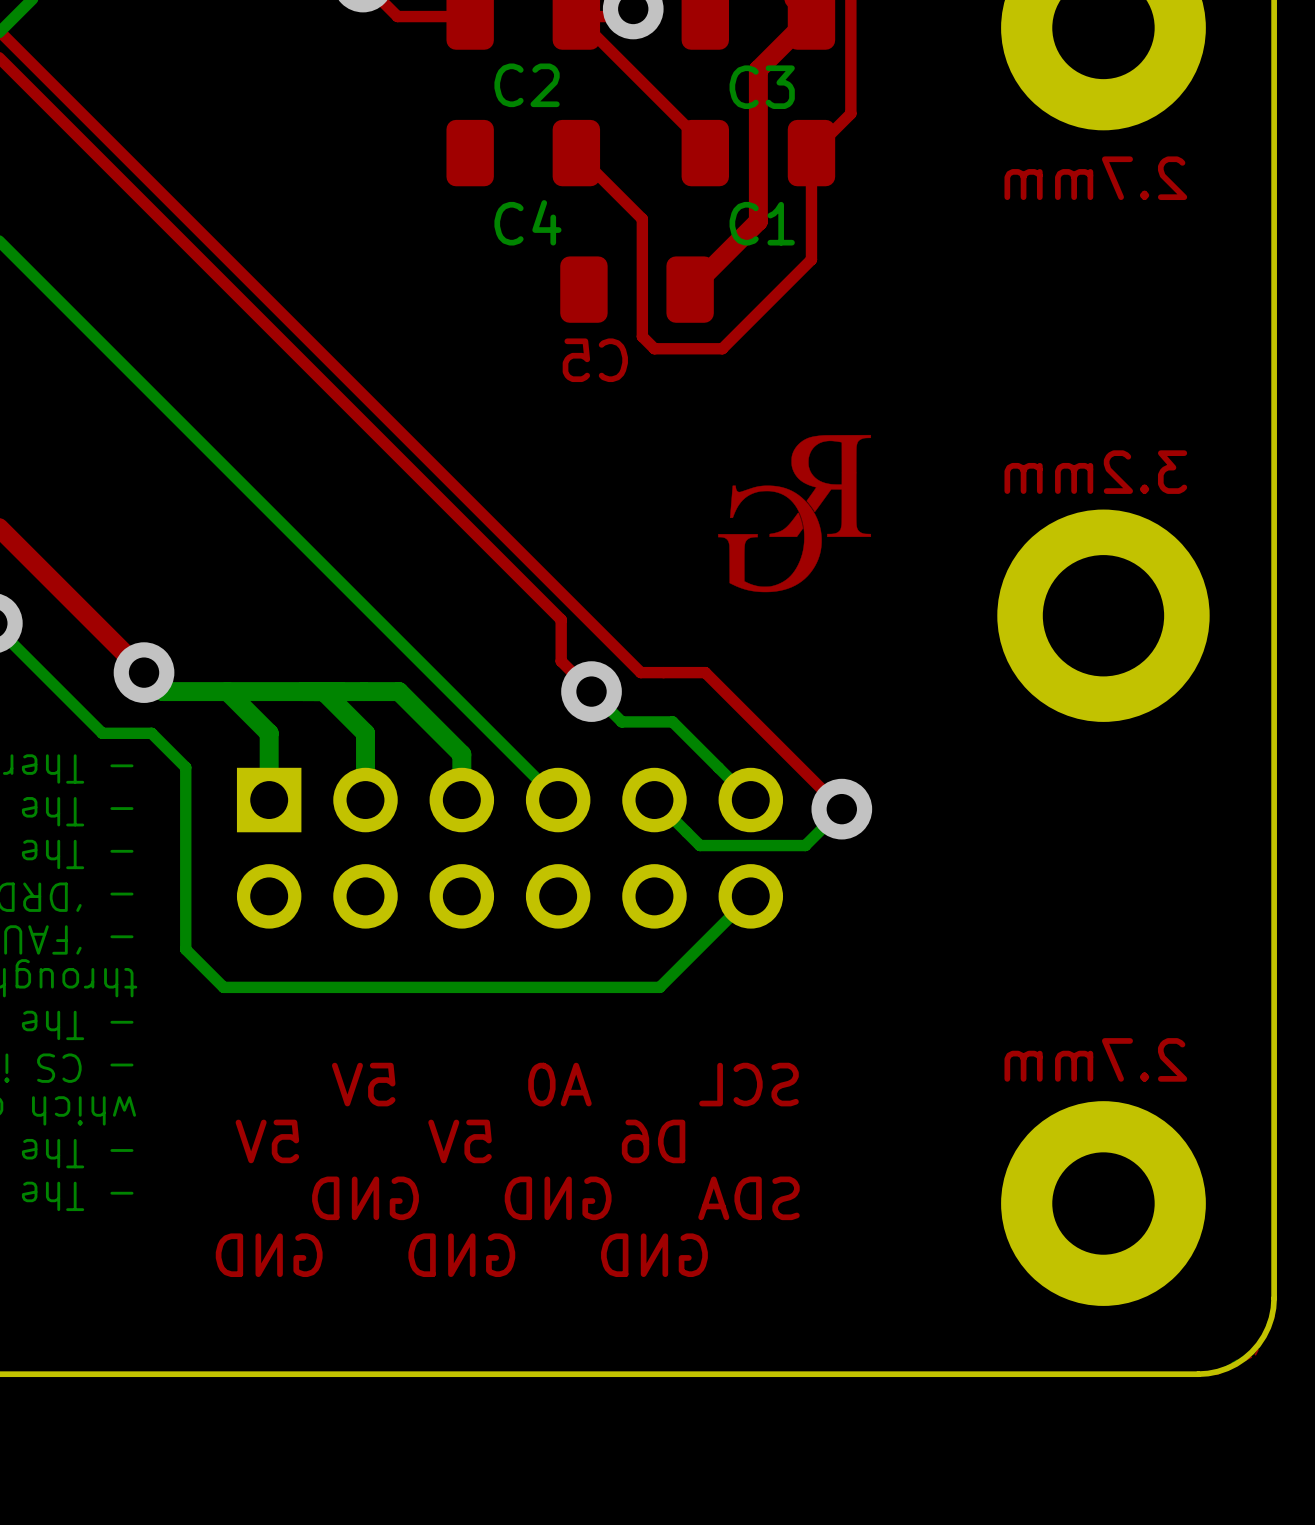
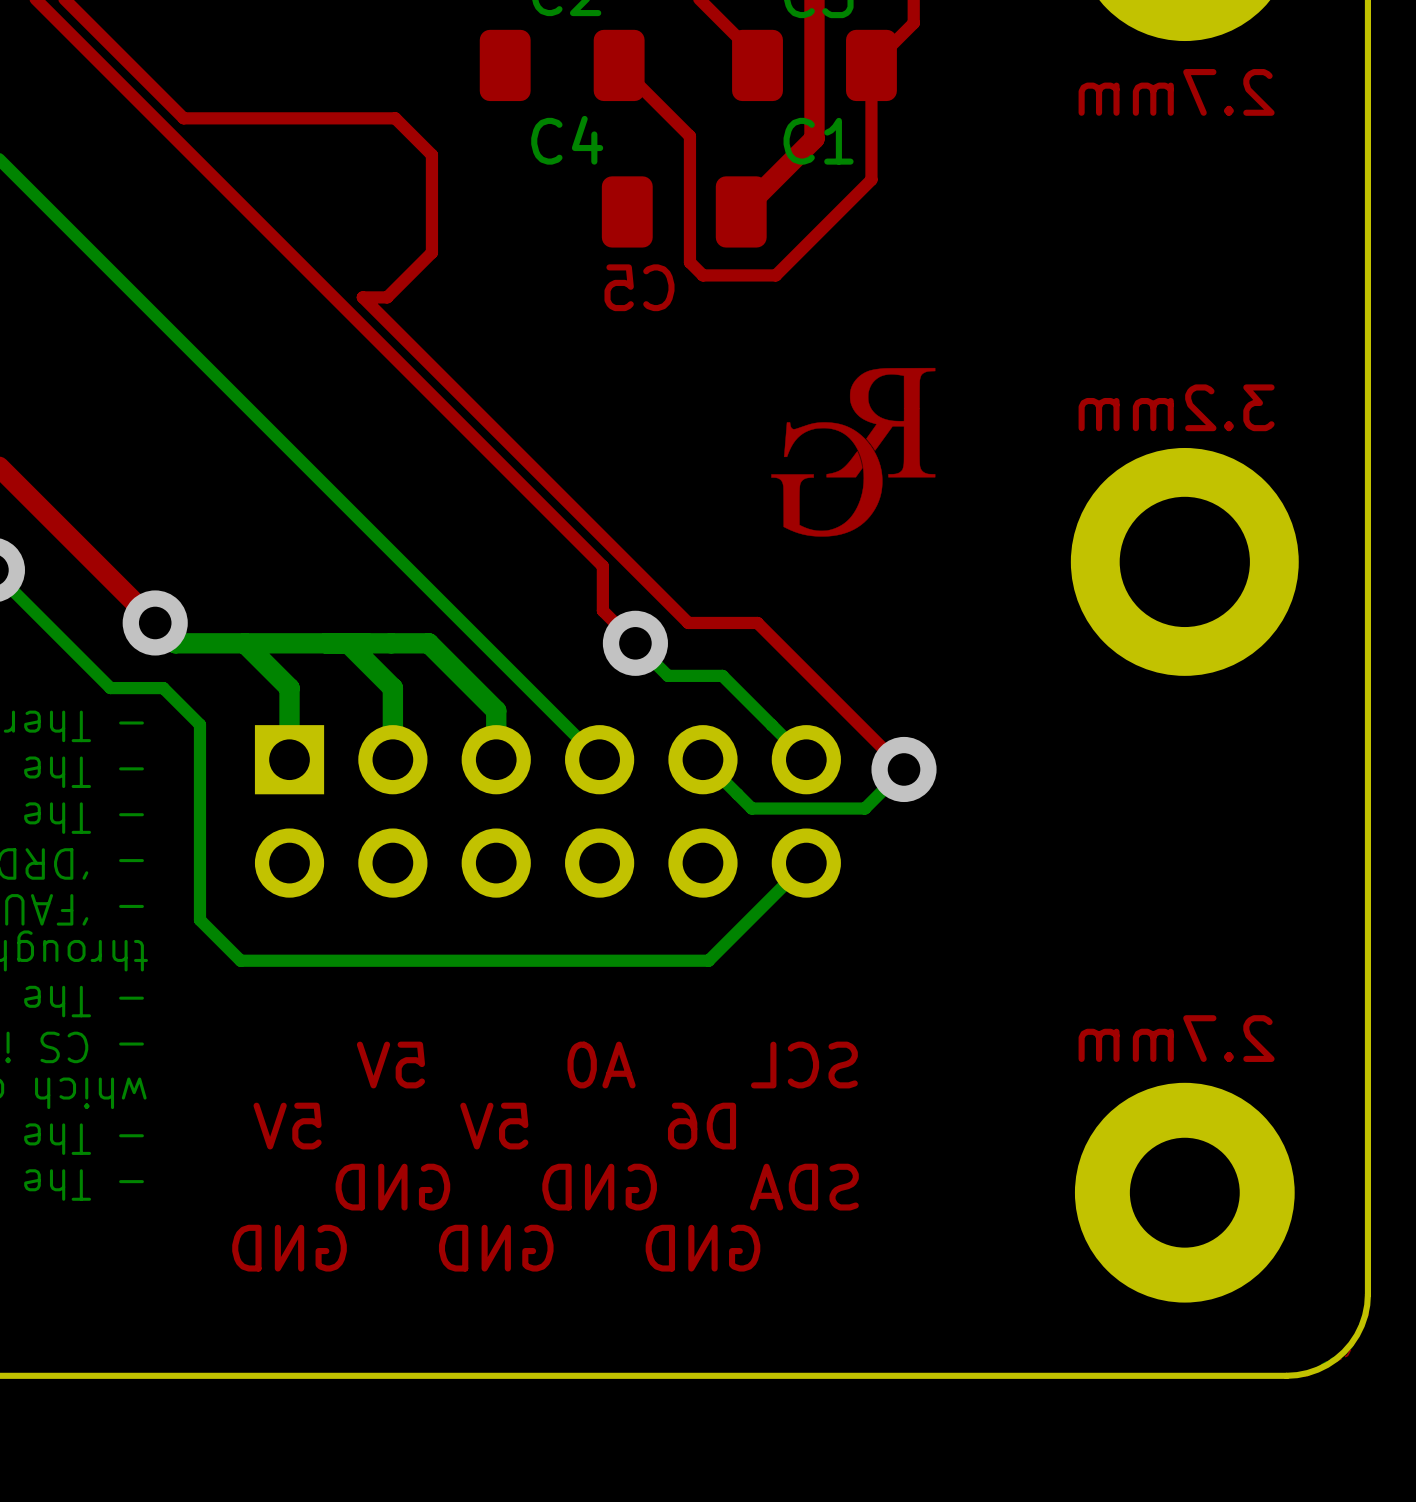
top track: (170, 202) (337, 369) -> (183, 118) (395, 118) (431, 154) (431, 252) (387, 297) (362, 297)

